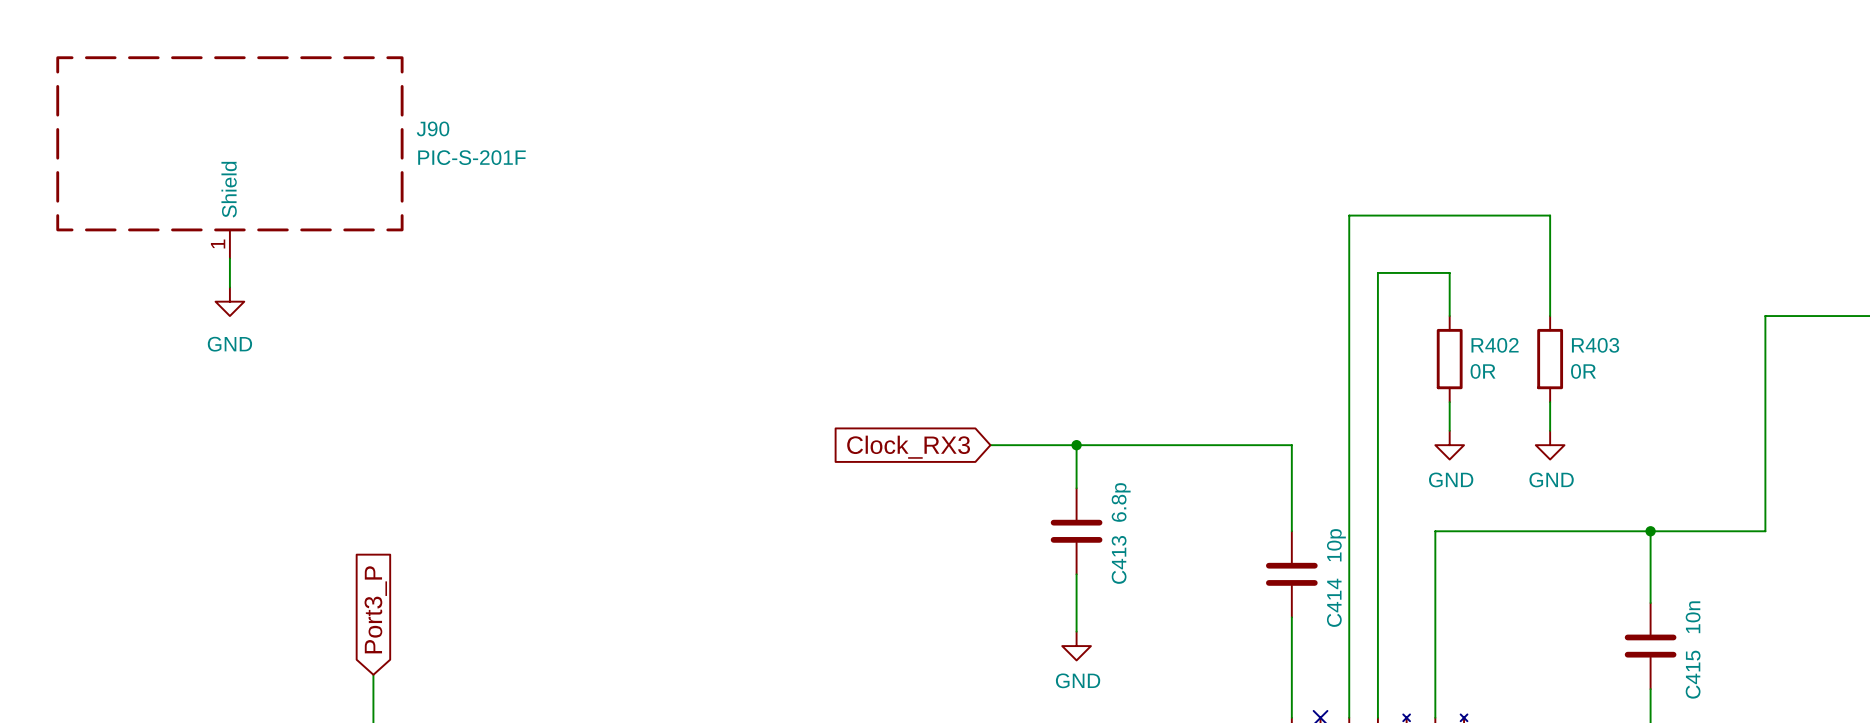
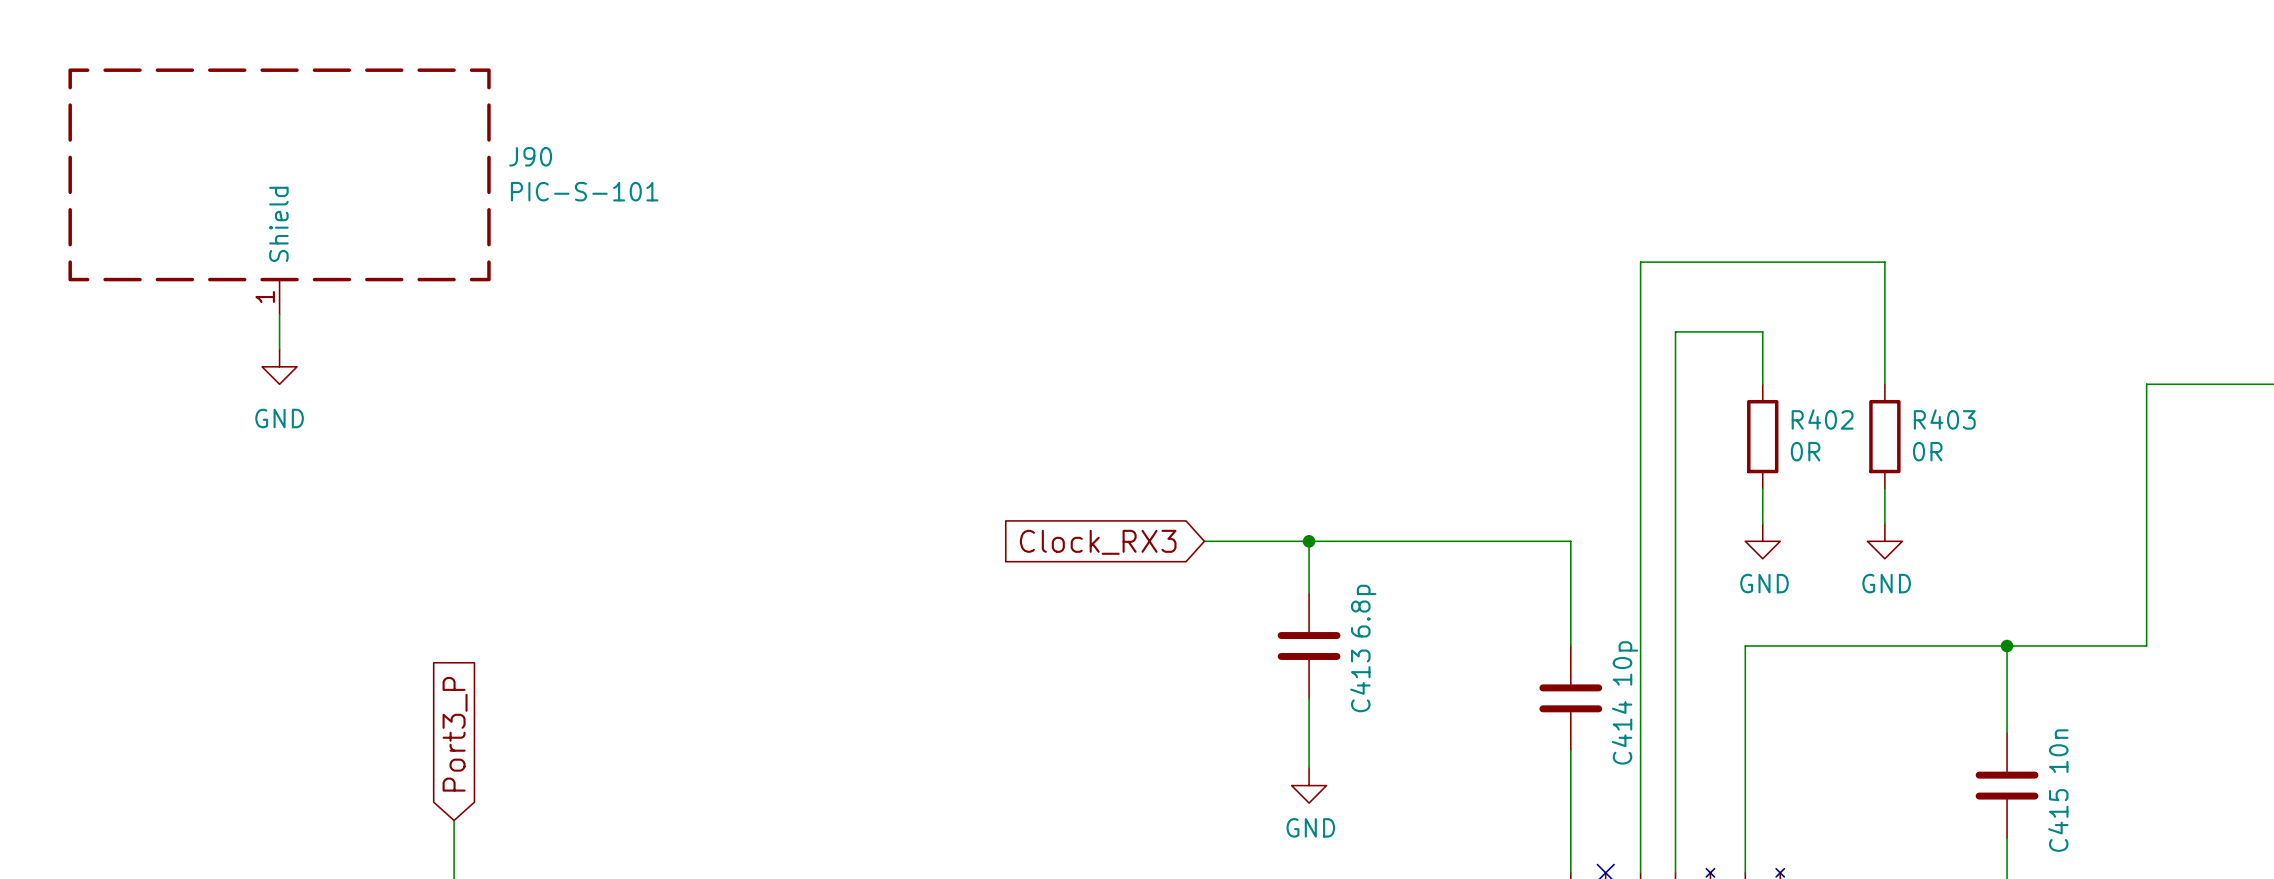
J90 value: PIC-S-201F (471, 157) -> PIC-S-101 (584, 191)

